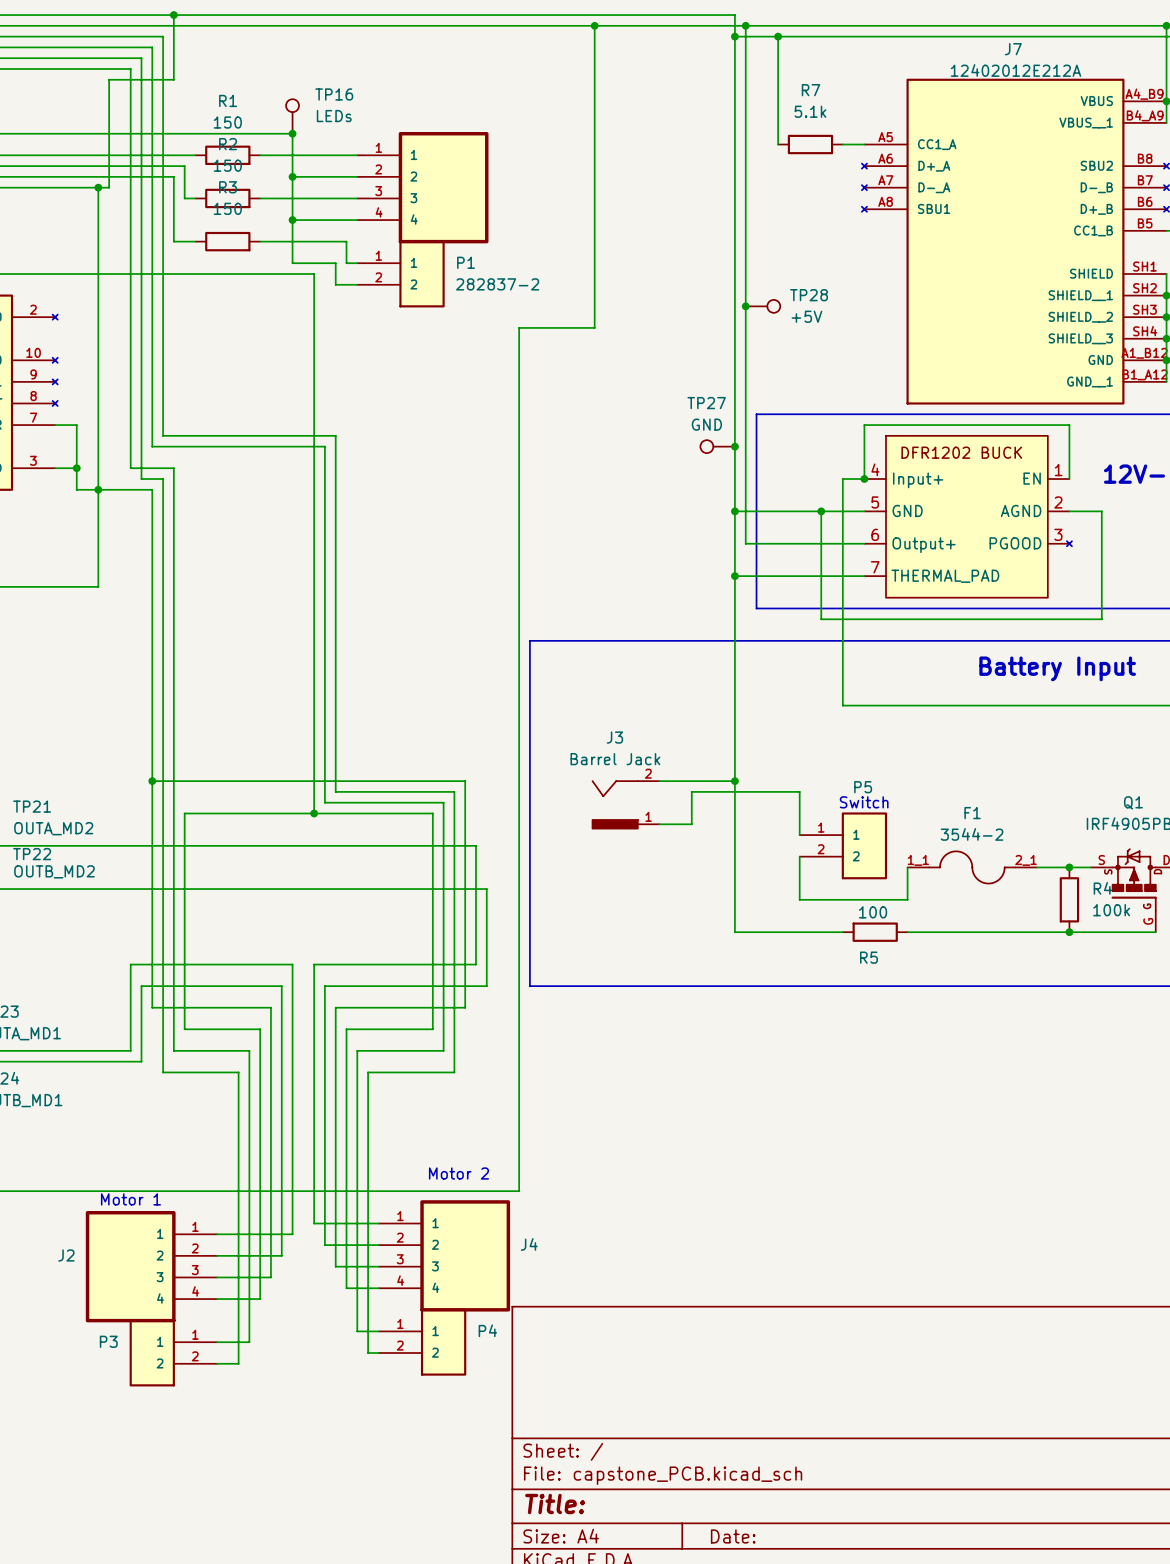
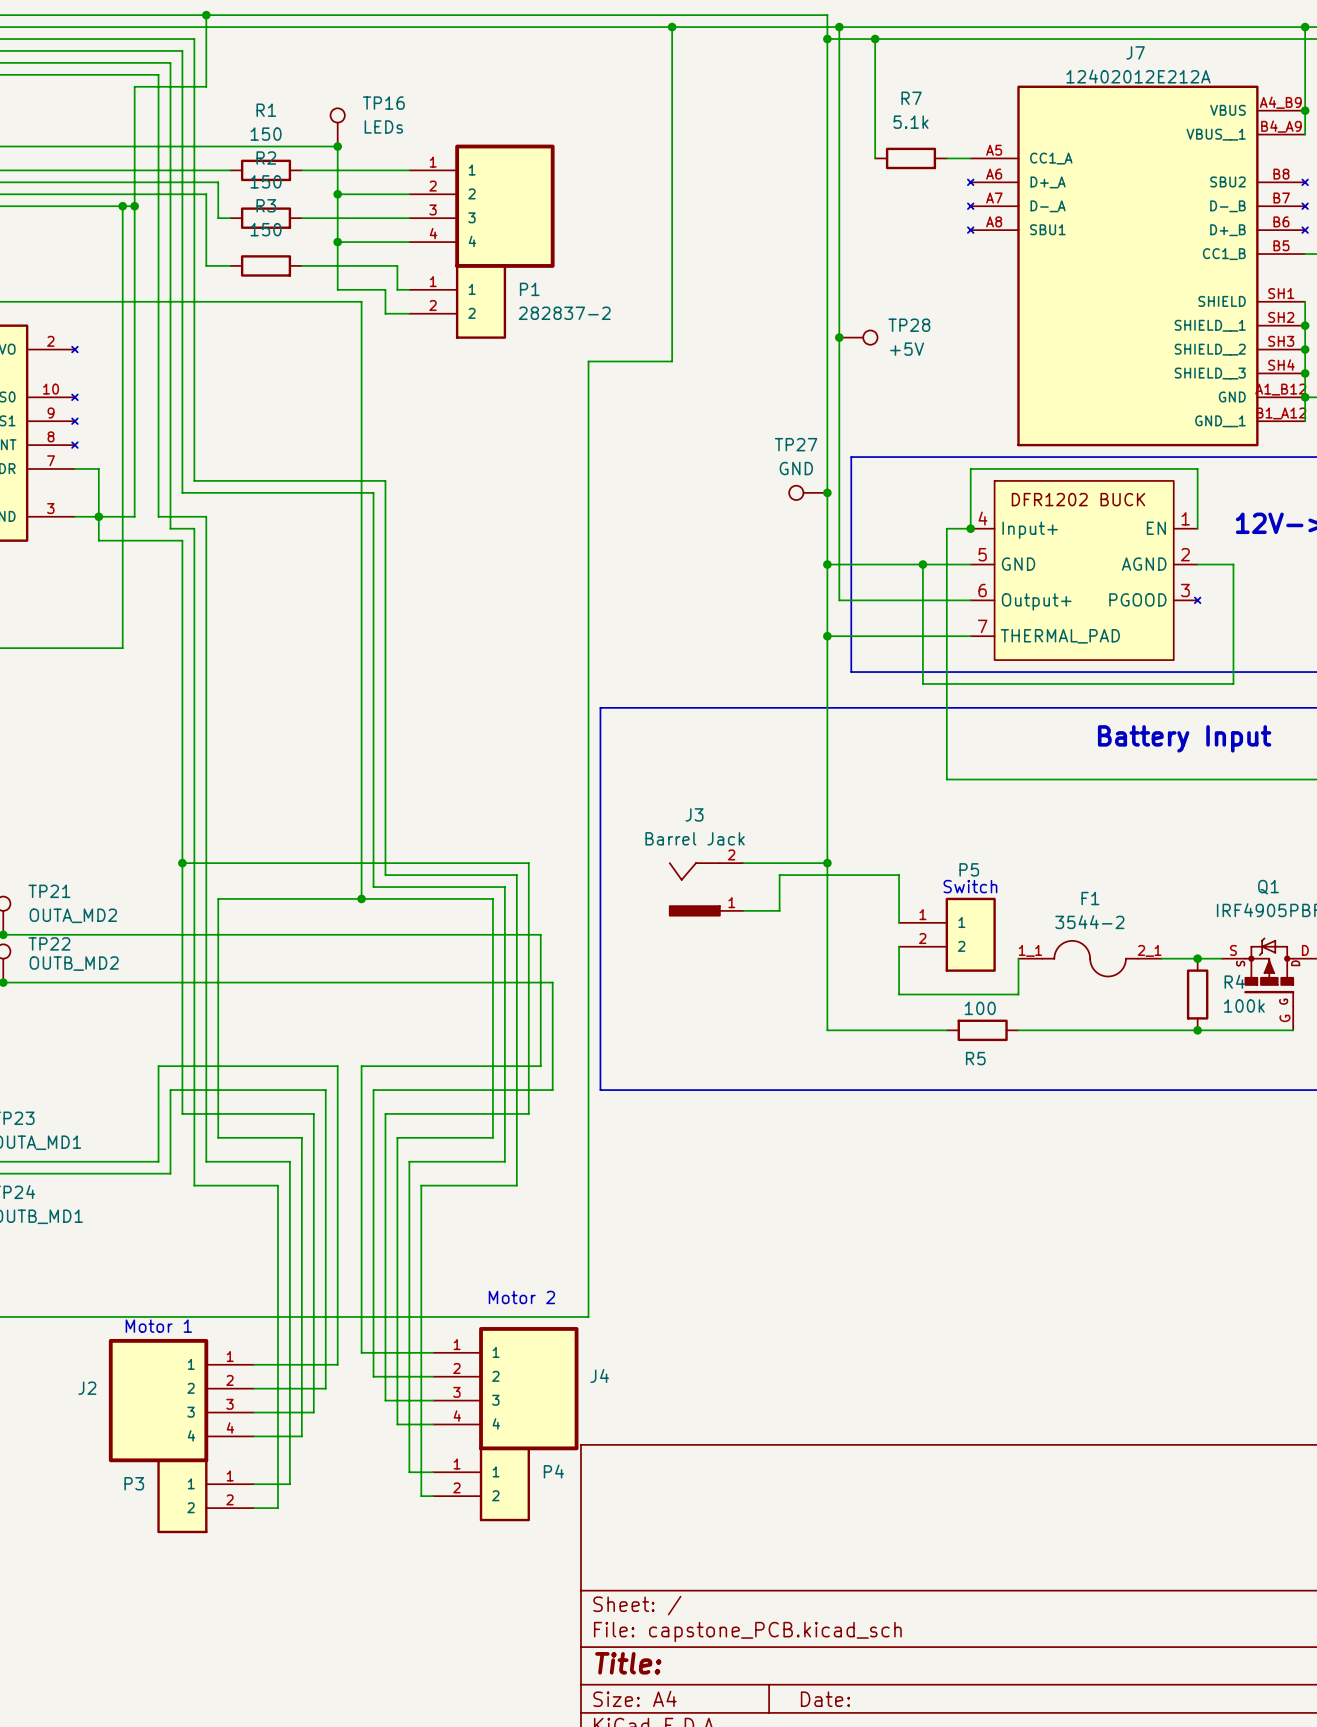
wire: none -> (134, 206) (134, 516) (98, 516)
junction: none -> (134, 206)
junction: (98, 489) -> none

